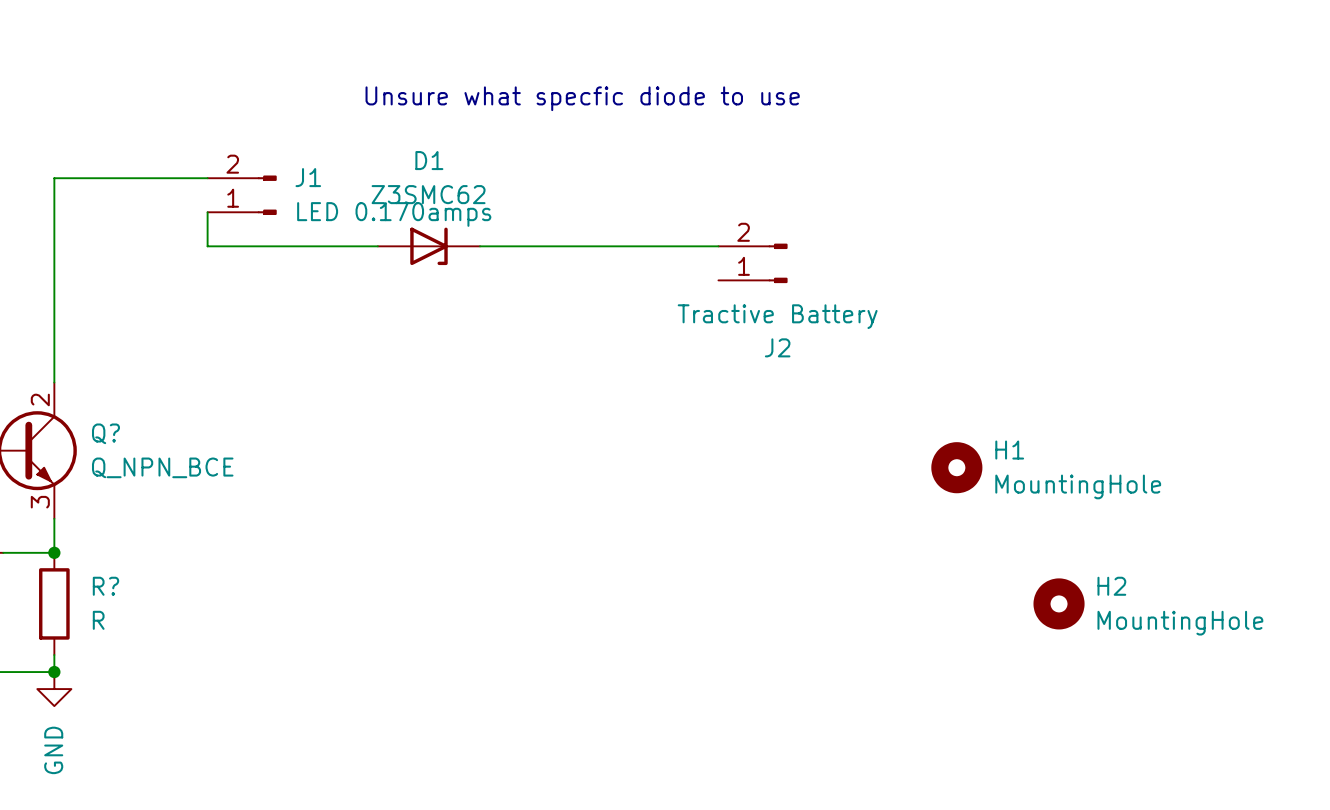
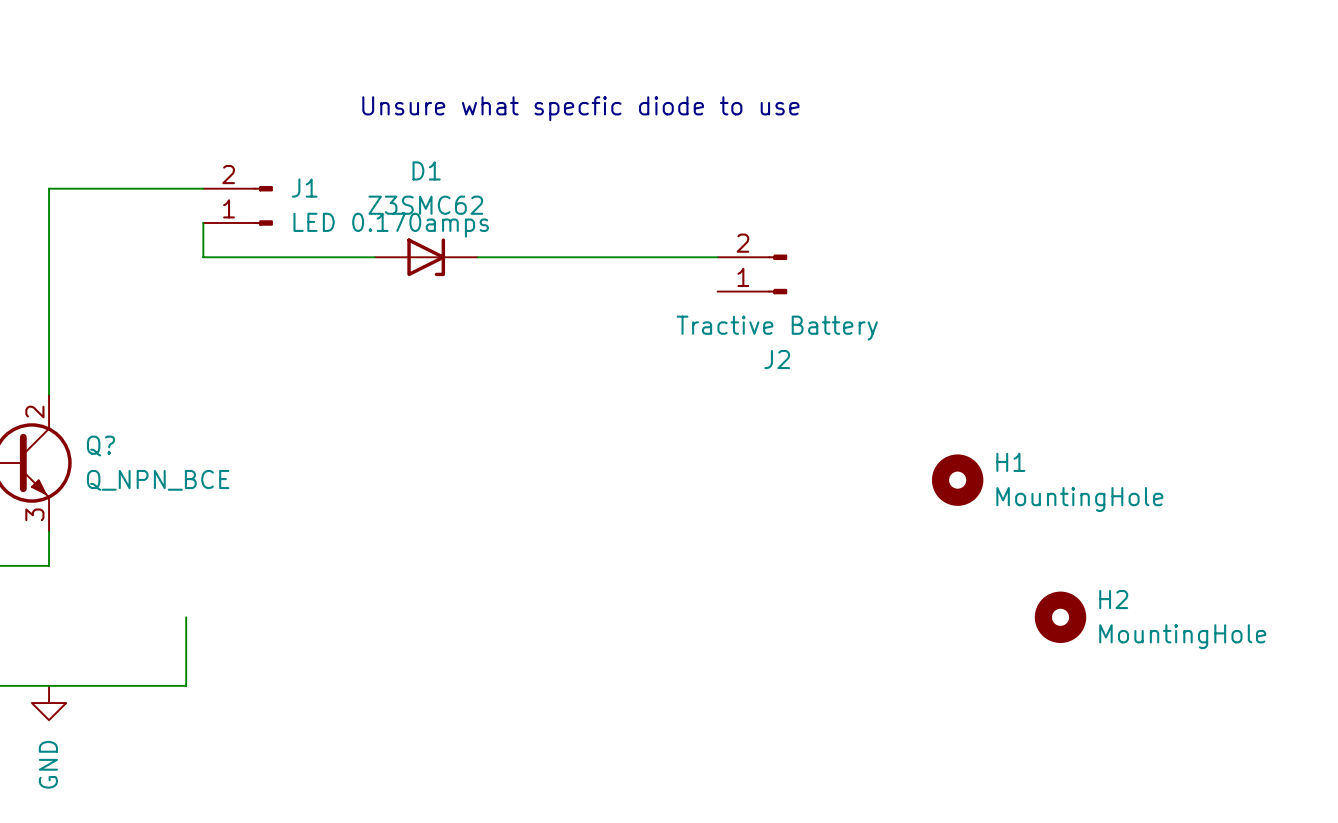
junction: (54, 552) -> none
R?: R (54, 603) -> none
wire: (54, 655) (54, 672) -> (186, 617) (186, 685) (49, 685)
junction: (54, 672) -> none

